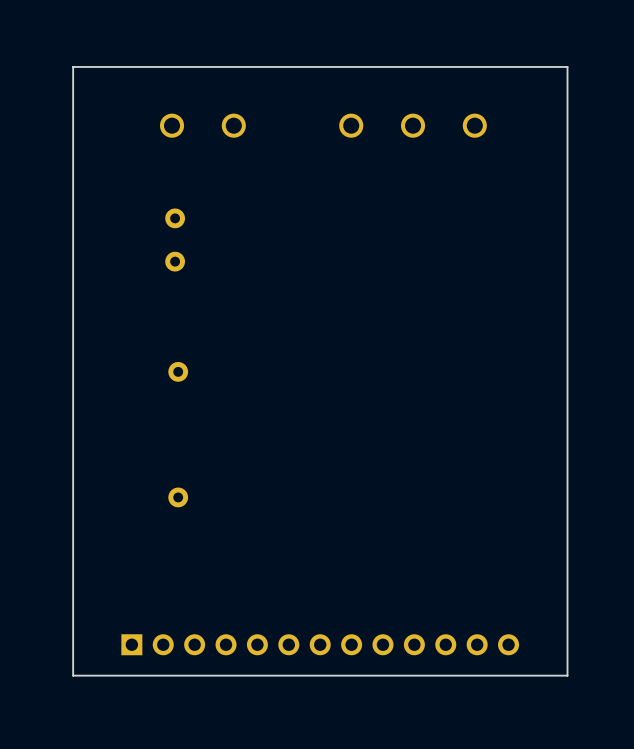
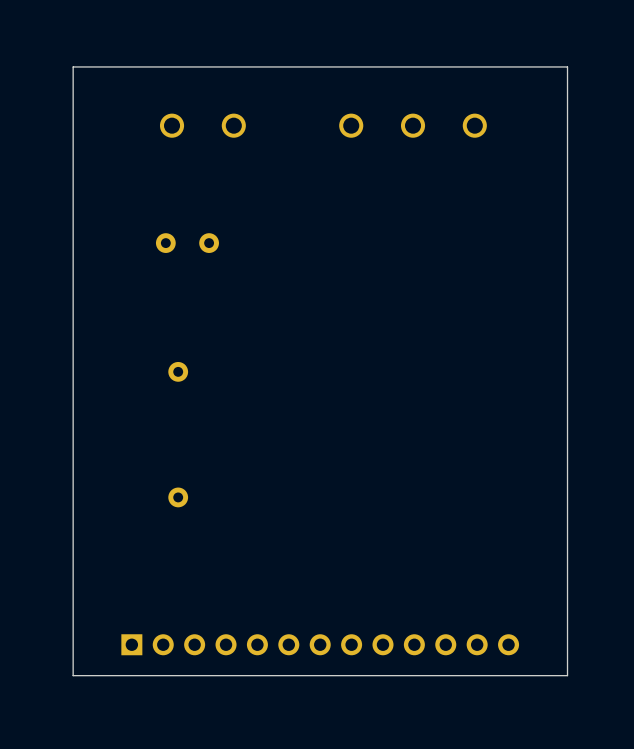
part rotation: 0° (175, 240) -> 90° clockwise (187, 243)

